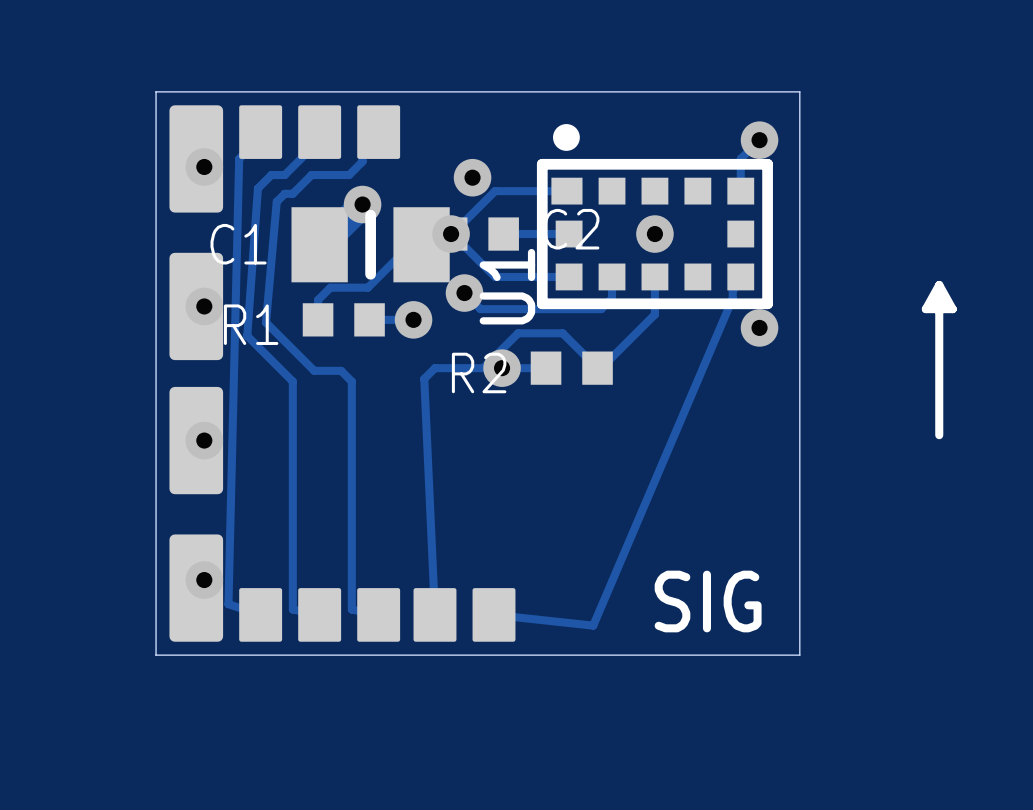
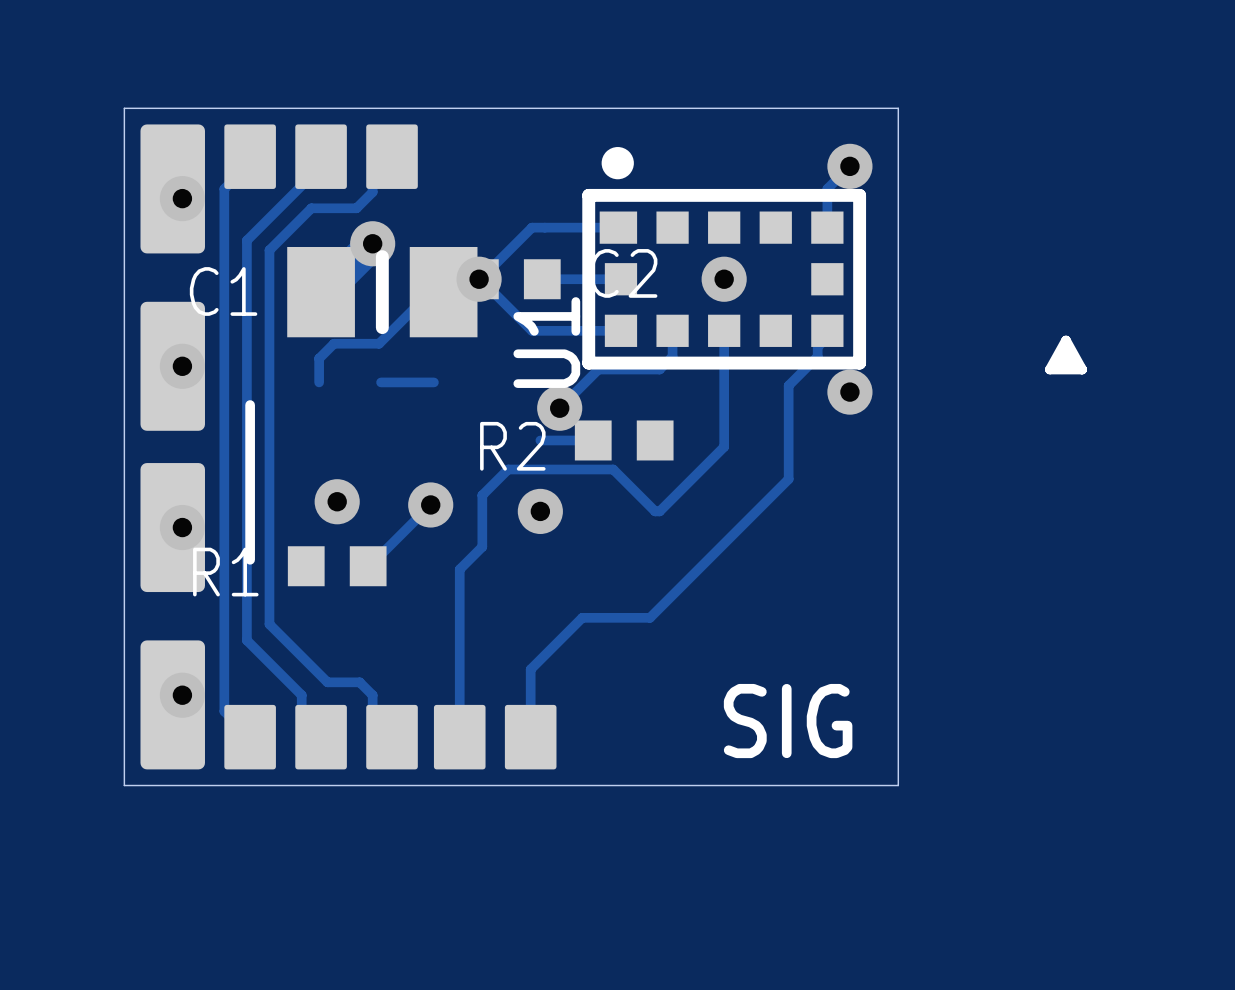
track: (239, 158) (228, 604) (260, 614) -> (224, 188) (224, 711) (250, 737)
track: (284, 175) (271, 175) (257, 188) (247, 335) (292, 381) (292, 609) (319, 614) -> (279, 208) (246, 240) (246, 640) (301, 695) (301, 717) (321, 737)
via: (472, 177) -> none
track: (292, 193) (284, 193) (276, 201) (266, 322) (314, 370) (341, 370) (351, 381) (351, 609) (378, 614) -> (288, 230) (269, 250) (269, 624) (327, 682) (359, 682) (372, 695) (372, 717) (392, 737)
track: (464, 293) (480, 309) (550, 309) -> (559, 408) (598, 369)
via: (464, 293) -> none
track: (732, 298) (593, 625) (494, 614) -> (817, 356) (788, 385) (788, 479) (650, 617) (582, 617) (530, 669) (530, 737)
line: (939, 306) (939, 435) -> (250, 405) (250, 559)
track: (654, 314) (601, 368) (597, 368) (562, 333) (518, 333) (483, 368) (434, 368) (424, 378) (434, 614) (440, 609) -> (724, 375) (724, 446) (659, 511) (655, 511) (613, 469) (508, 469) (482, 495) (482, 546) (459, 569) (459, 737)
R1 position: (343, 319) -> (337, 566)
via: (413, 319) -> none
via position: (502, 368) -> (559, 408)
via: none -> (337, 501)
track: none -> (430, 504) (369, 566)
via: none -> (430, 504)
via: none -> (540, 511)

